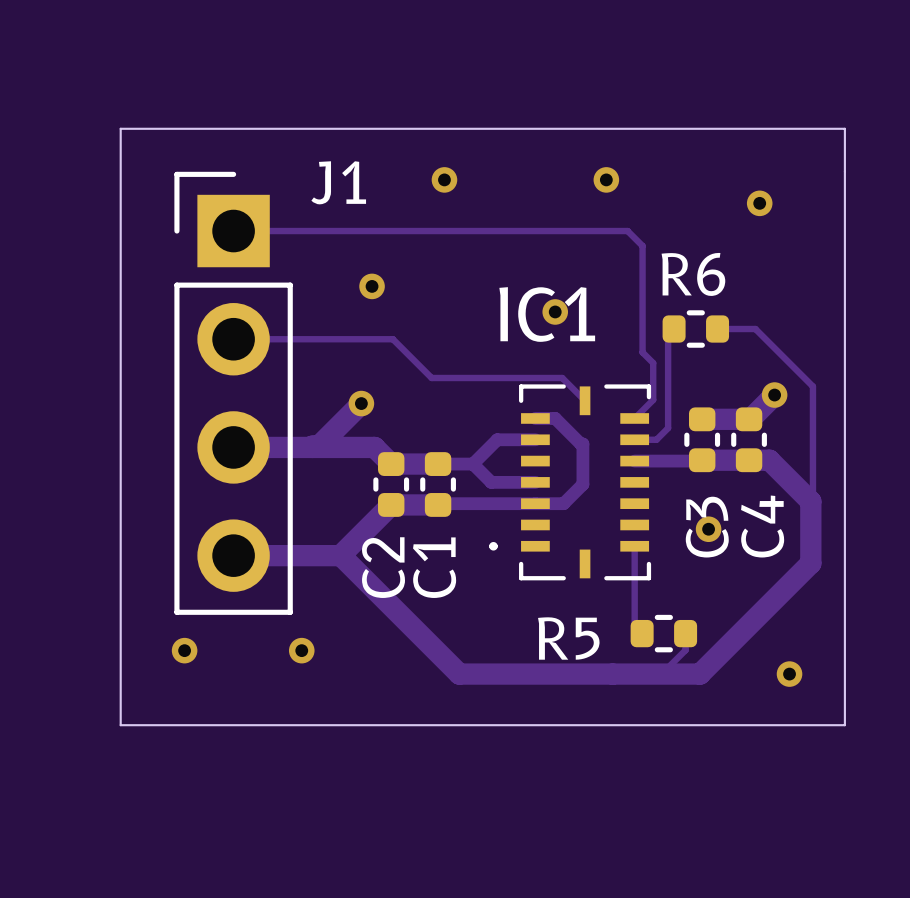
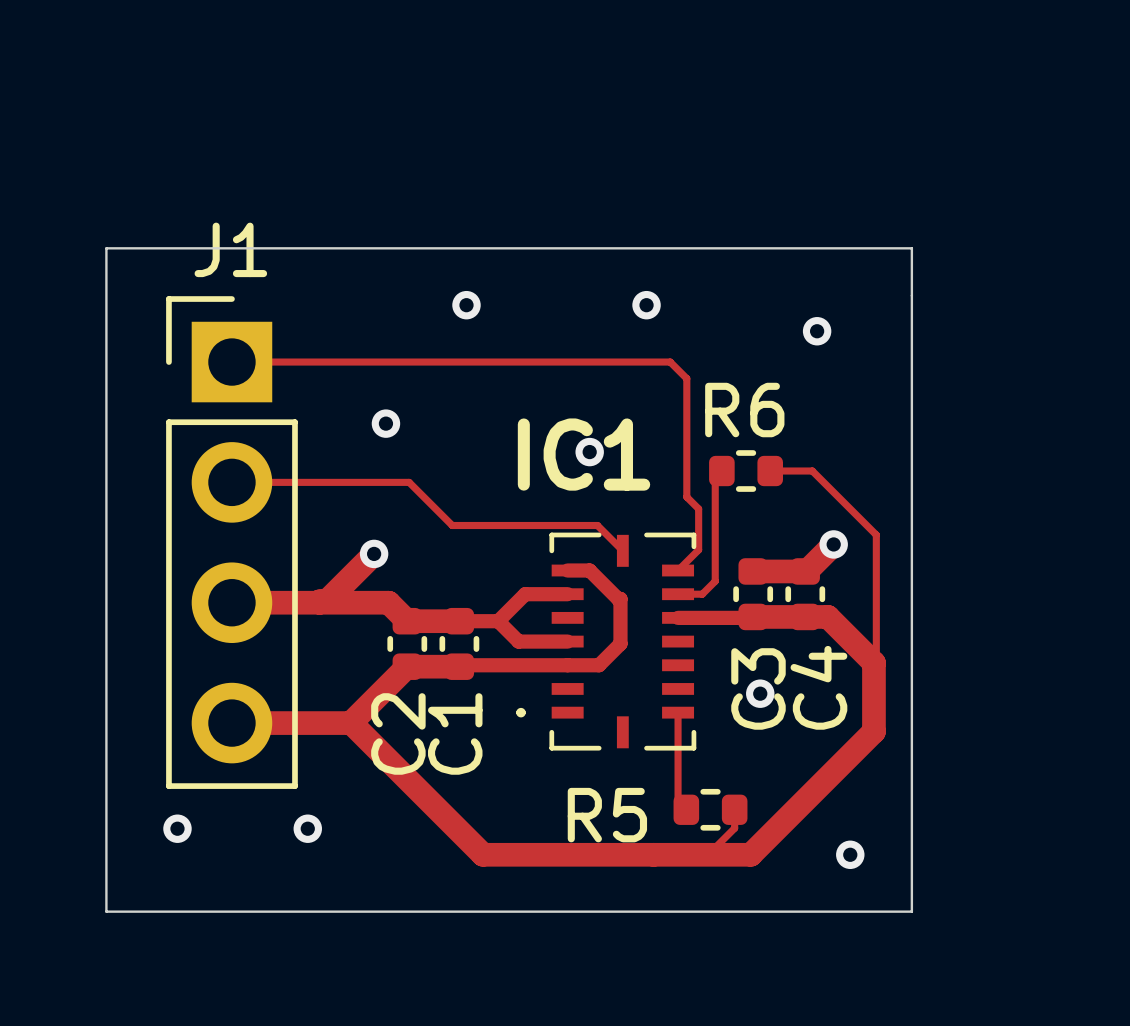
J1 name position: J1 (338, 182) -> J1 (230, 249)

